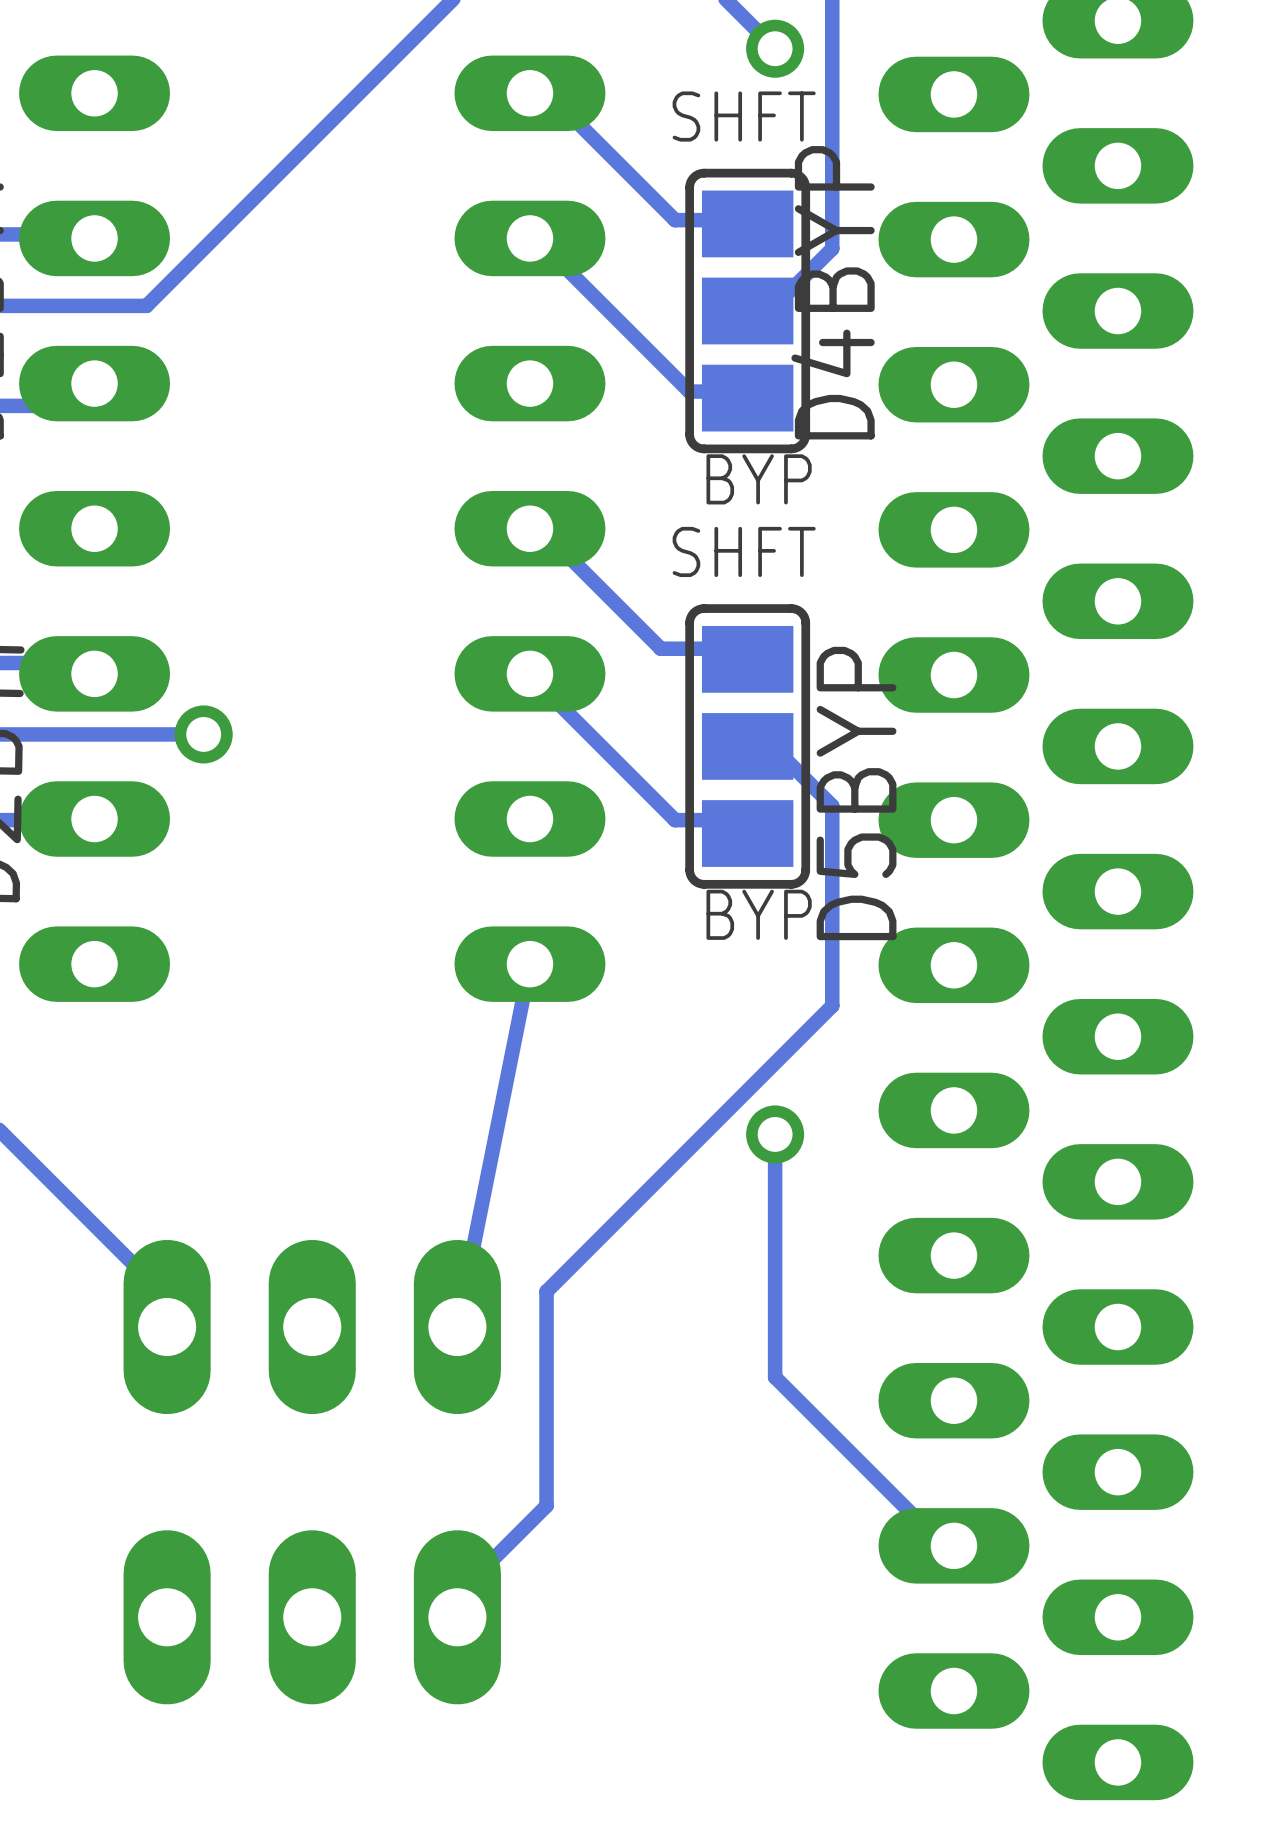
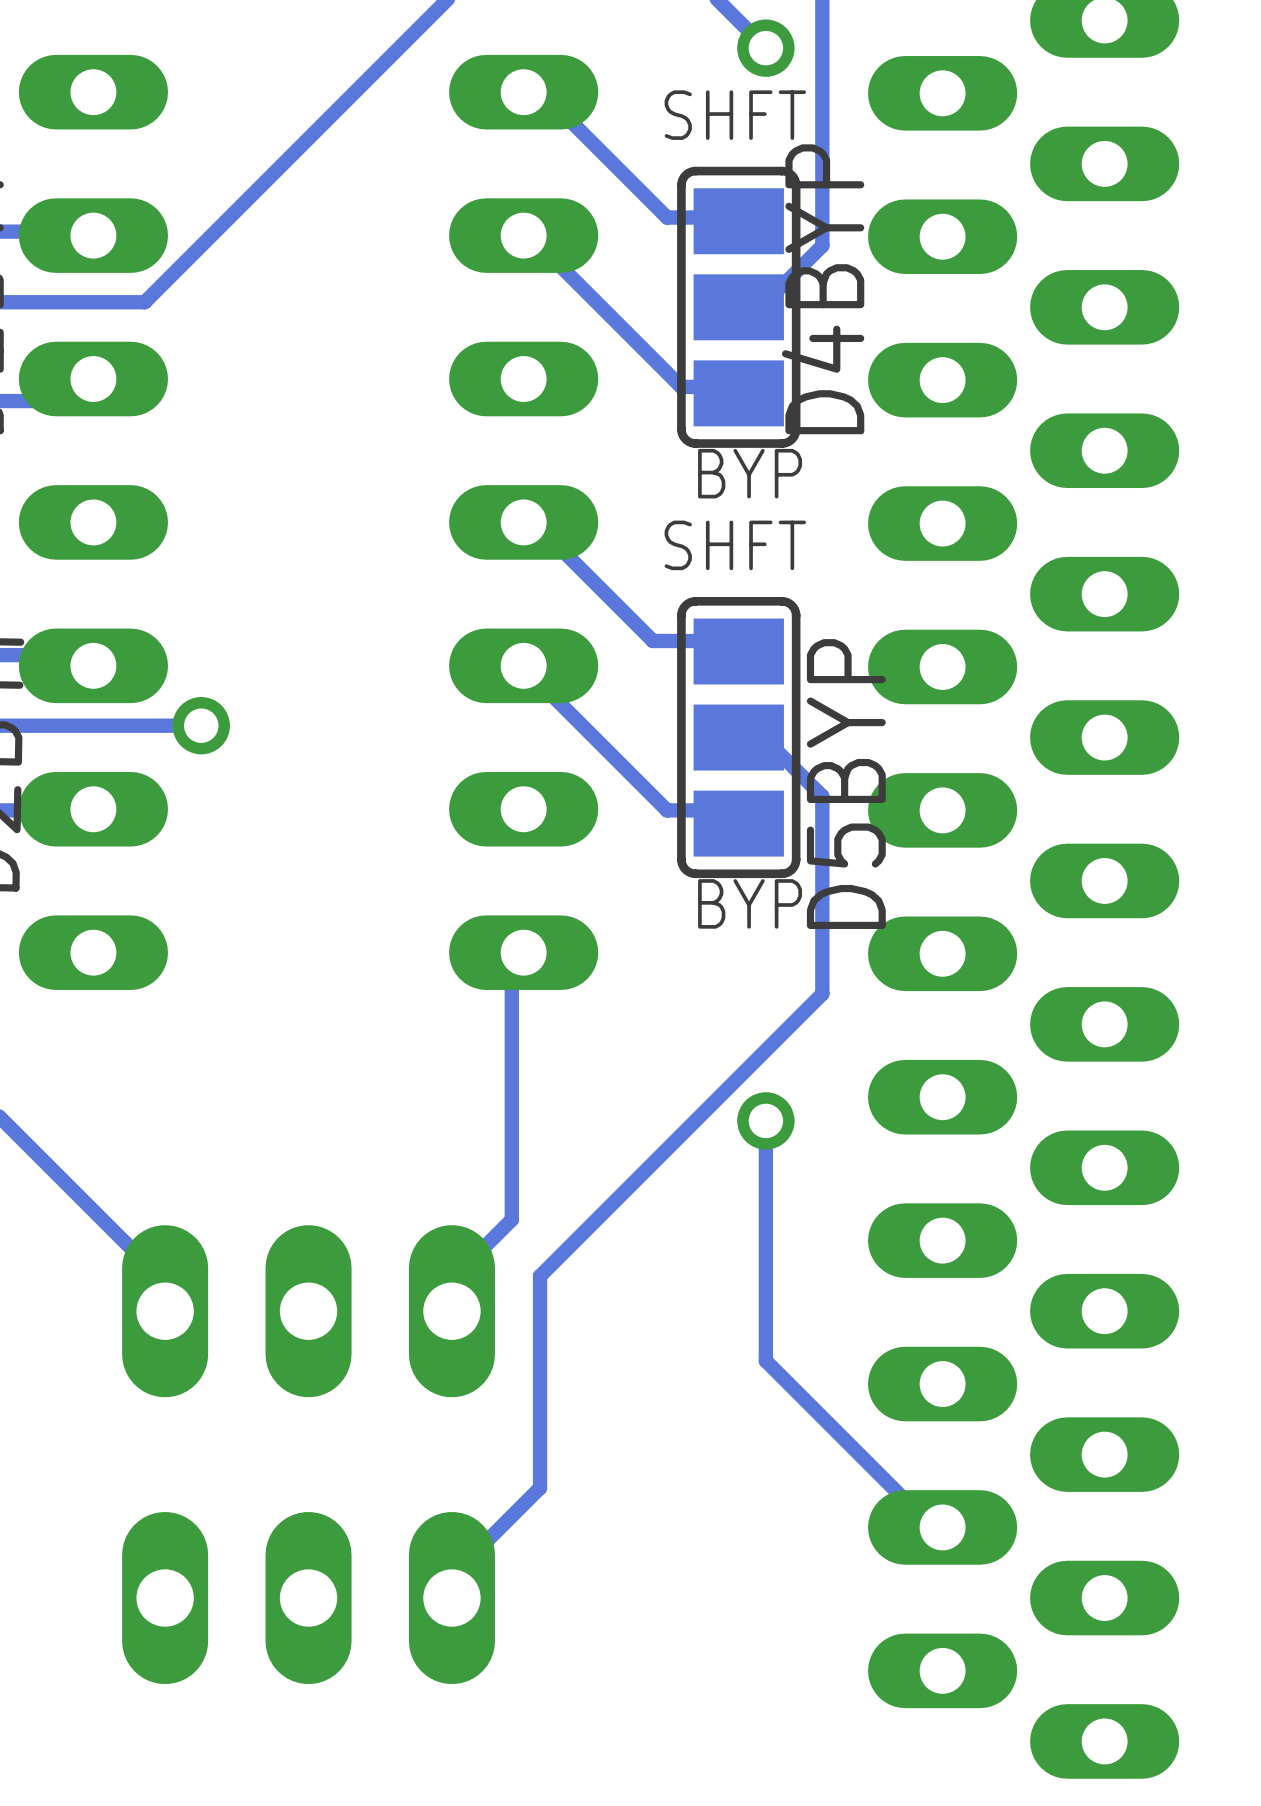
track: (529, 964) (457, 1327) -> none
track: none -> (511, 965) (511, 1219) (455, 1276) (455, 1304)

